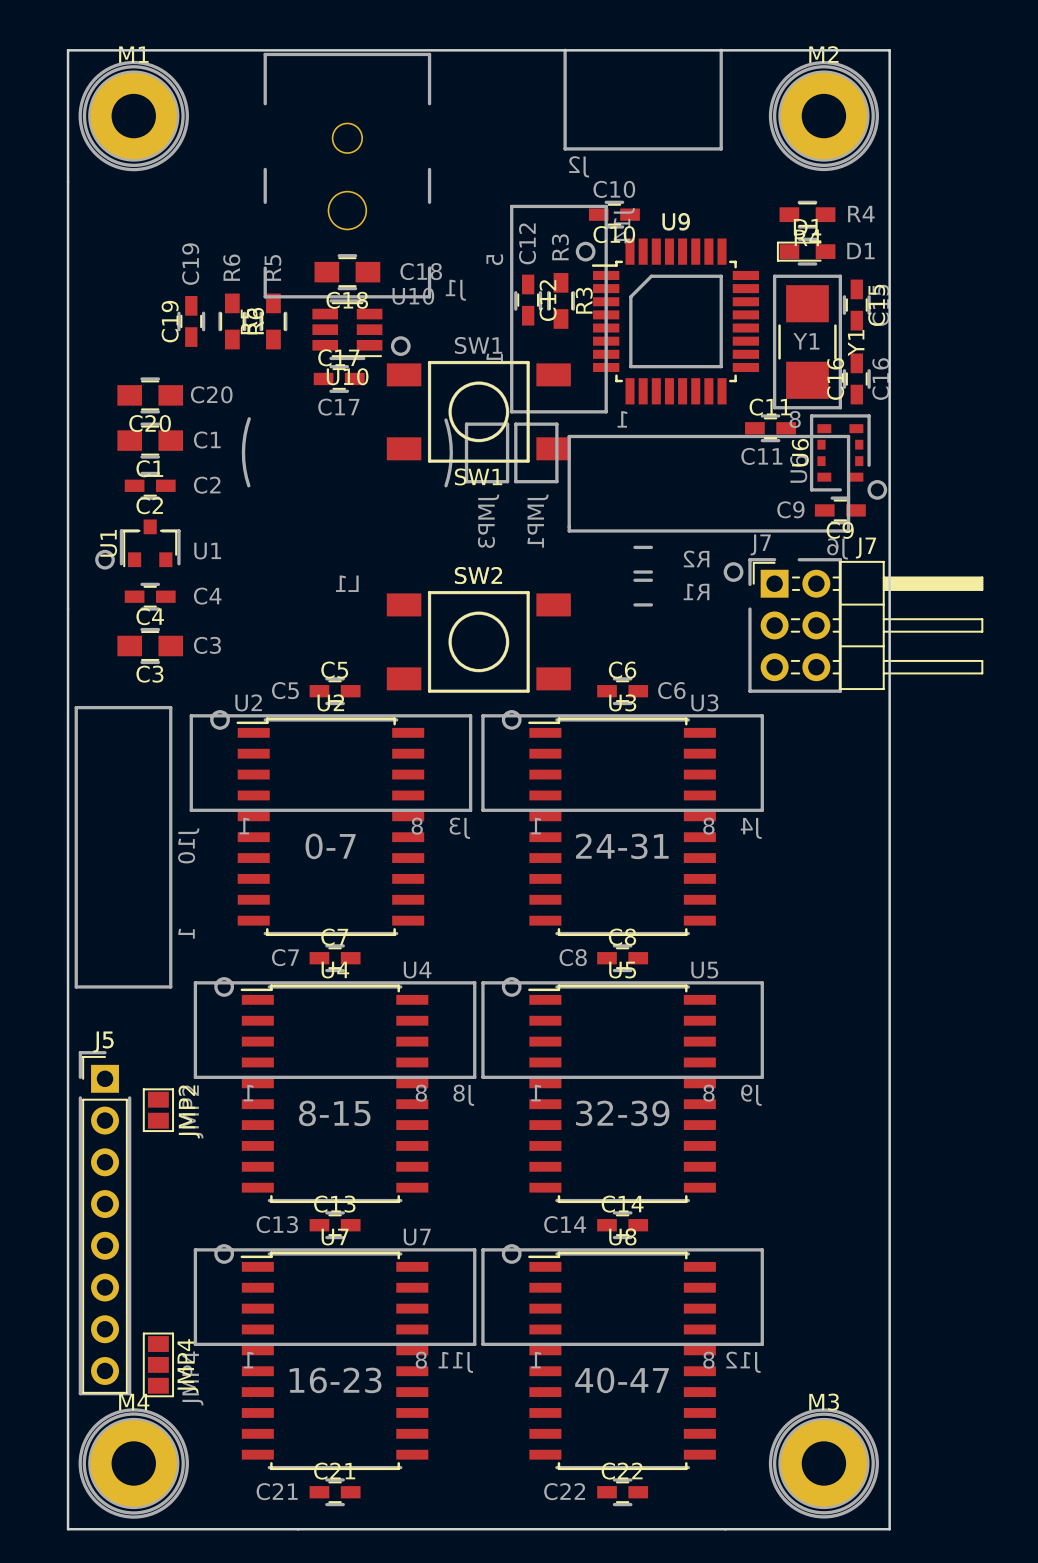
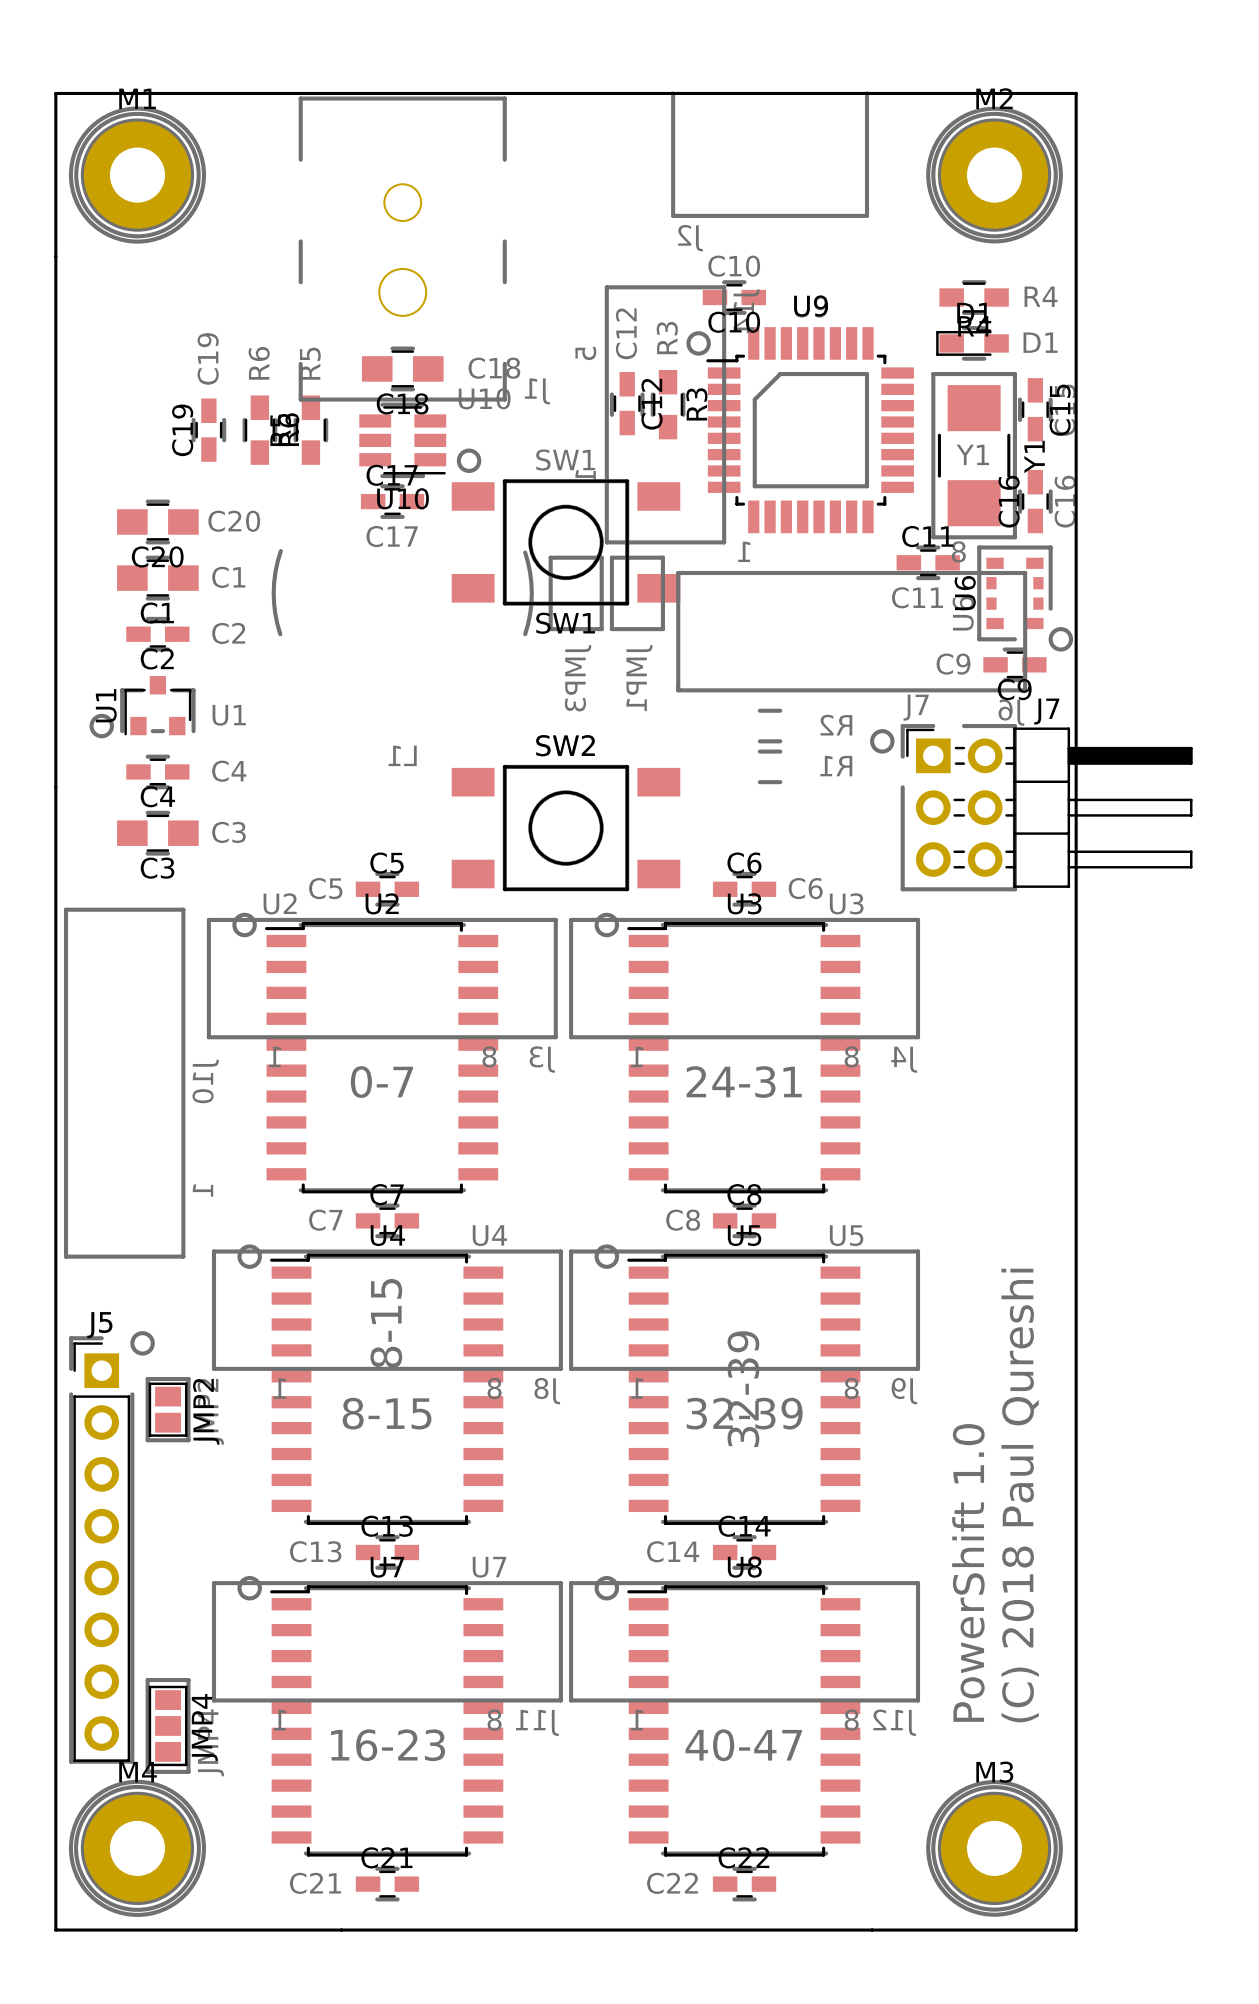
line: none -> (152, 731) (162, 731)
text: none -> 8-15 (386, 1323)
drawing: none -> [130, 1331, 155, 1356]
line: none -> (147, 1379) (147, 1440) (188, 1440) (188, 1379) (147, 1379)
text: none -> 32-39 (743, 1389)
text: none -> (C) 2018 Paul Qureshi (1020, 1495)
text: none -> PowerShift 1.0 (968, 1572)
line: none -> (147, 1680) (147, 1771) (188, 1771) (188, 1680) (147, 1680)

